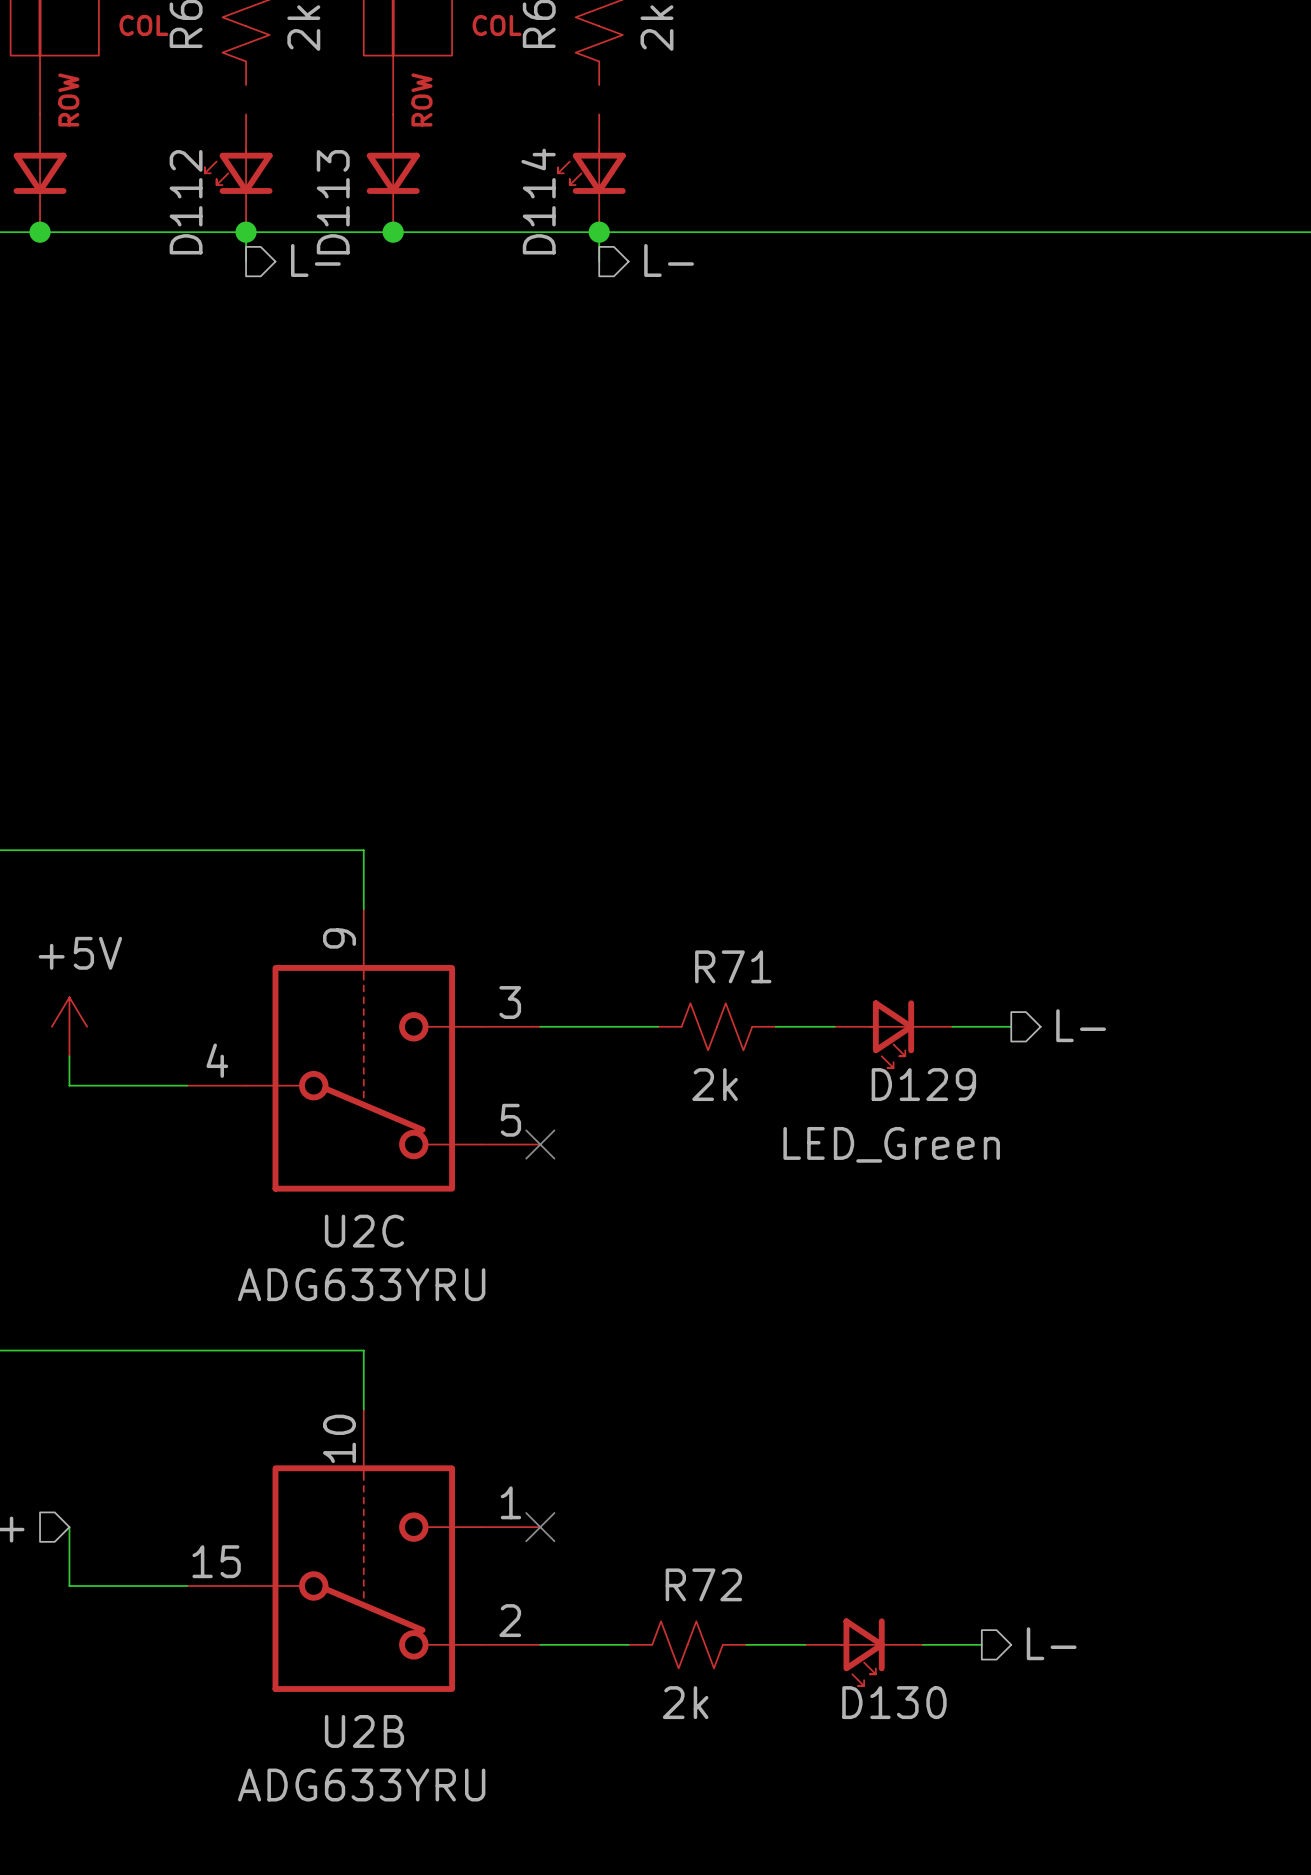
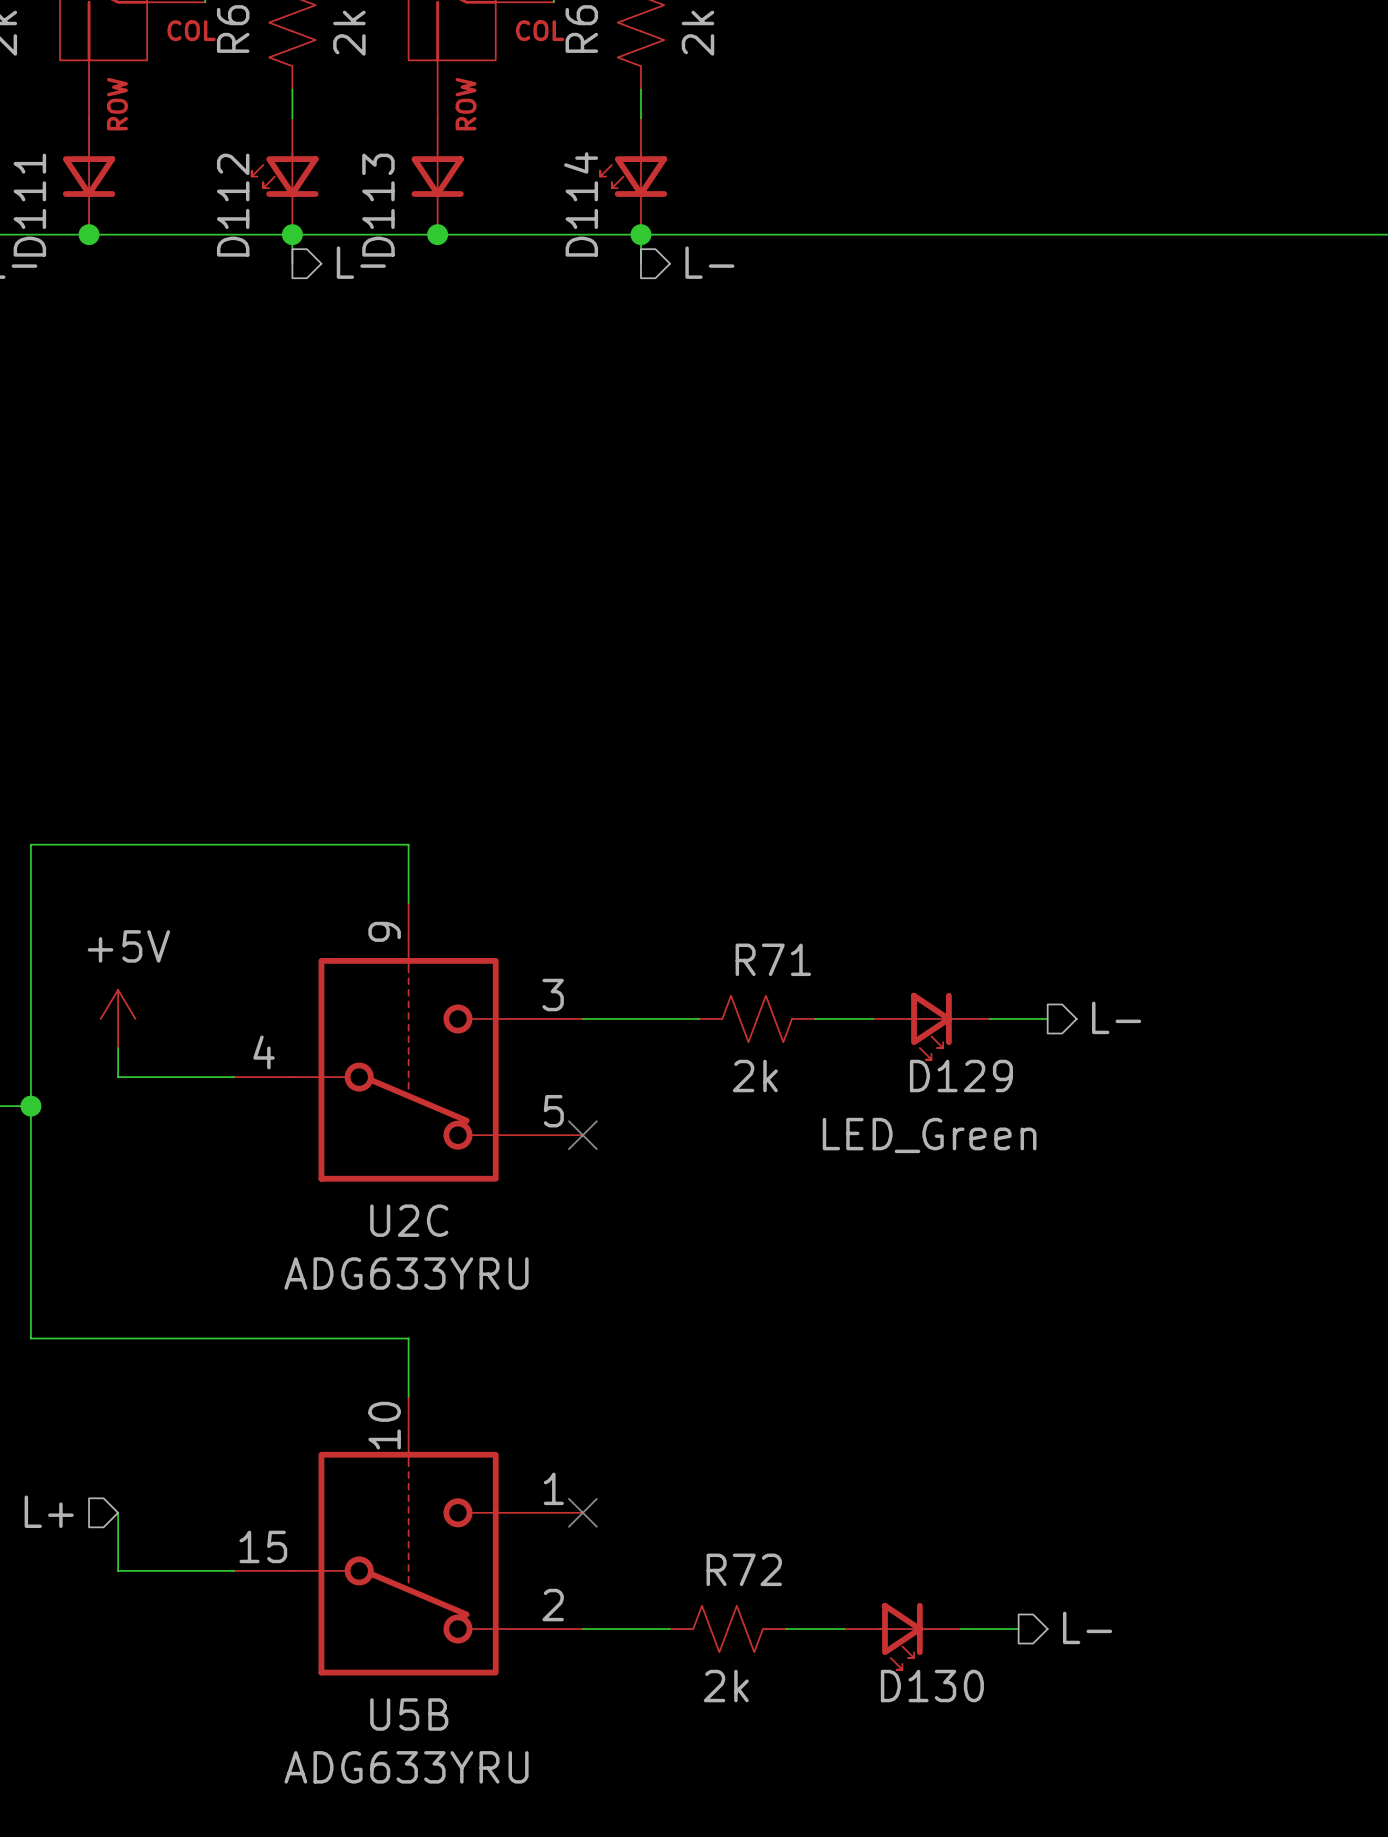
wire: none -> (292, 89) (292, 118)
wire: none -> (640, 89) (640, 118)
U2B name: U2B (364, 1731) -> U5B (409, 1714)

